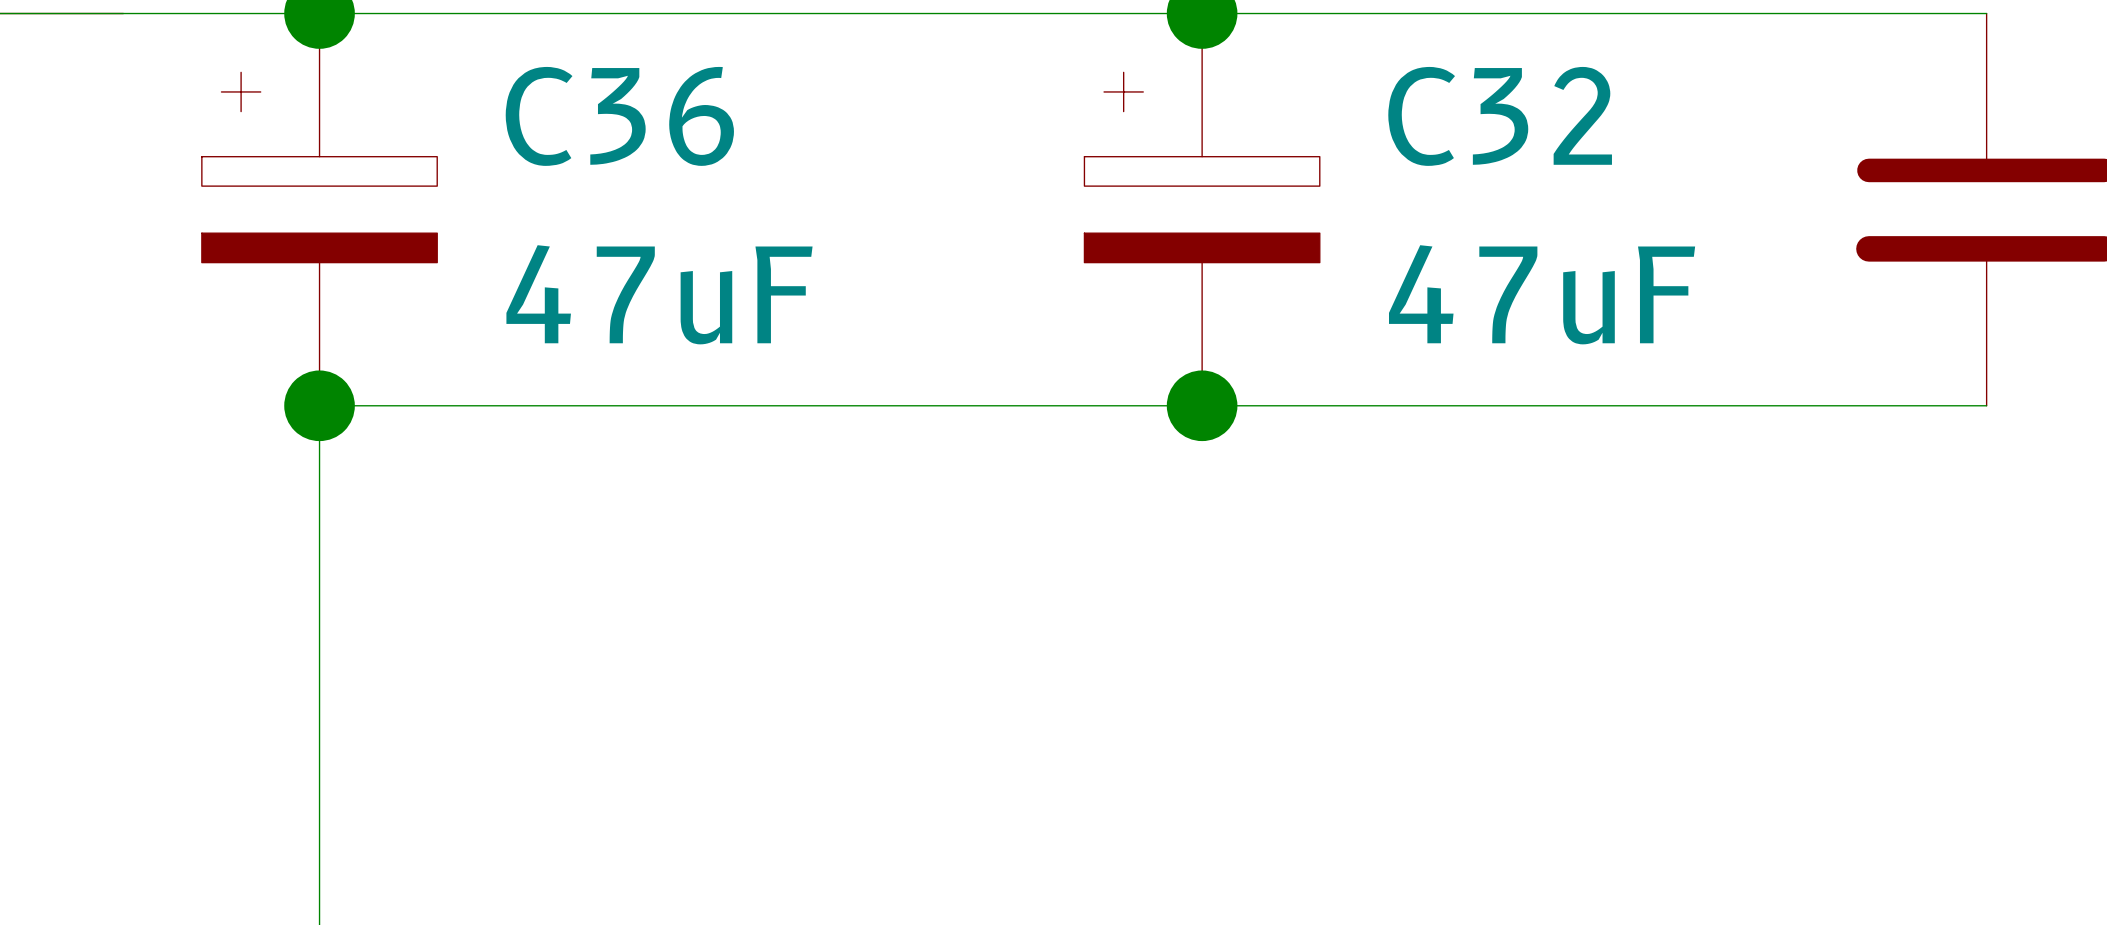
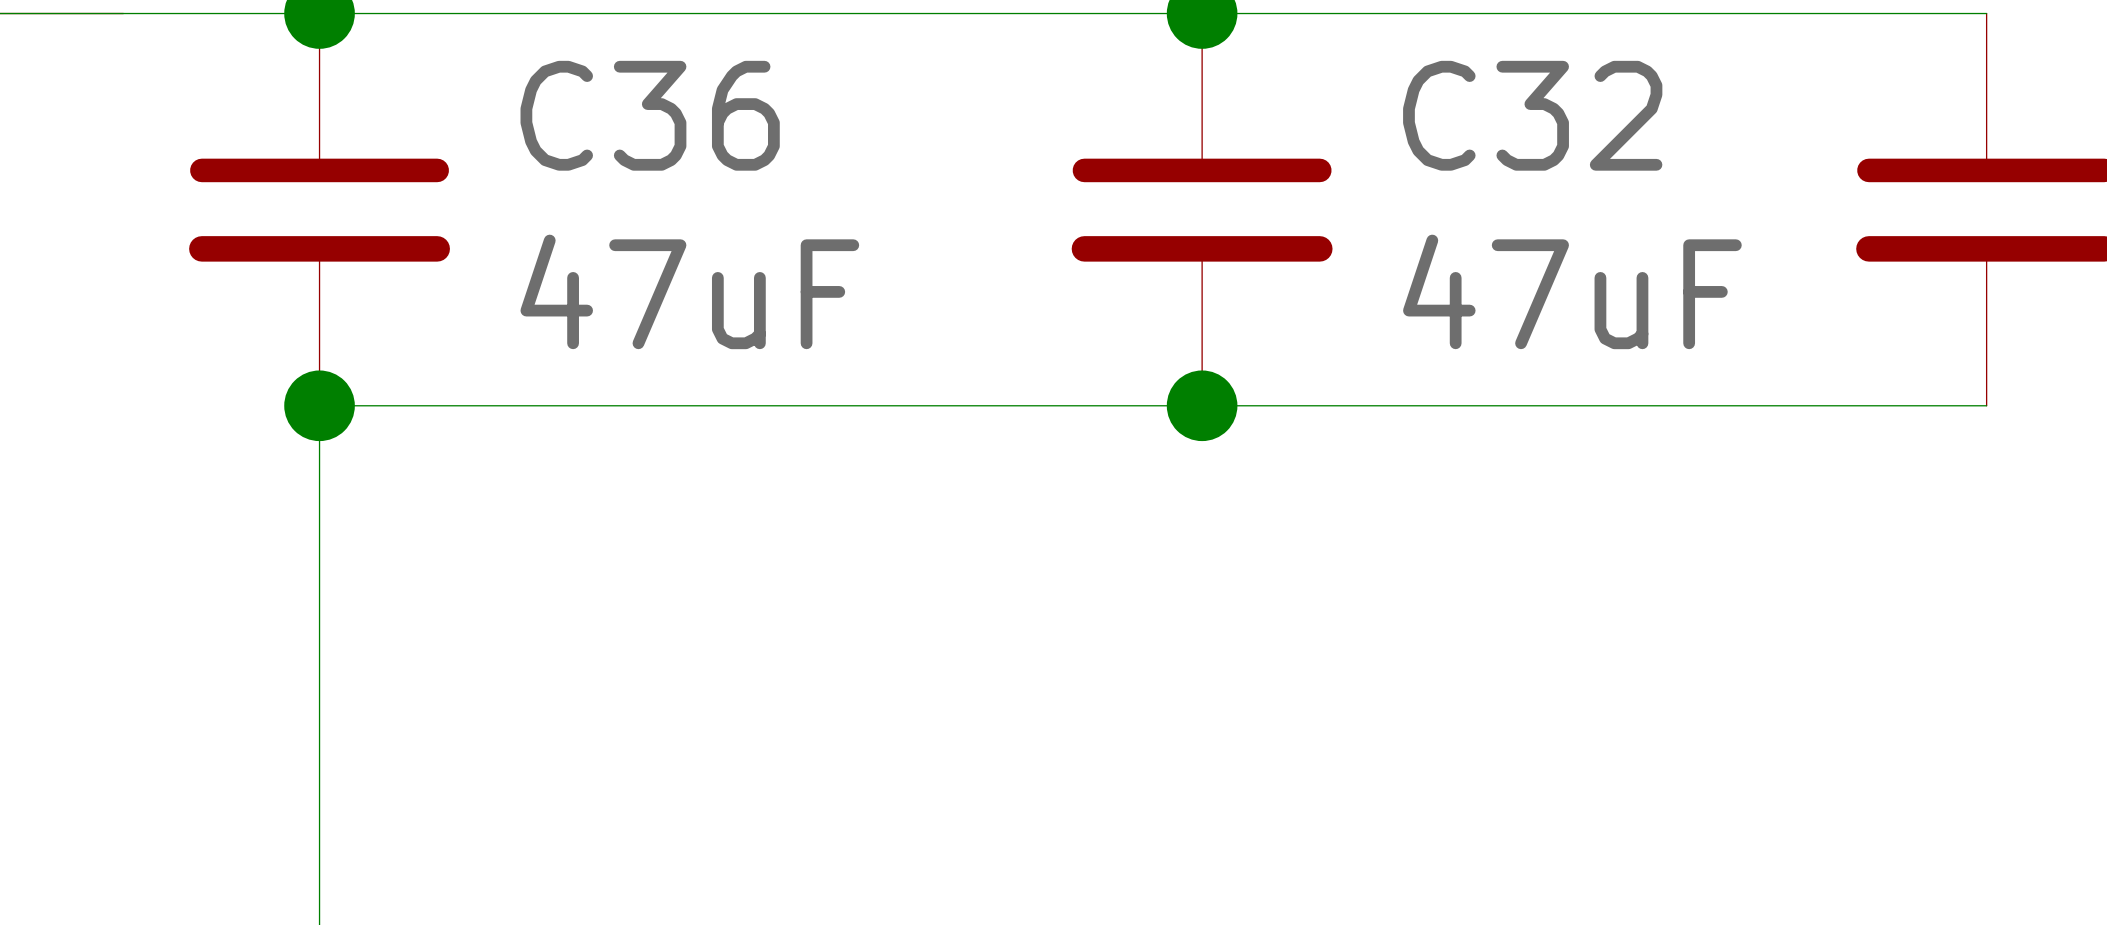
C36 symbol: [201, 13, 438, 406] -> [189, 13, 450, 406]
C32 symbol: [1084, 13, 1320, 406] -> [1071, 13, 1333, 406]

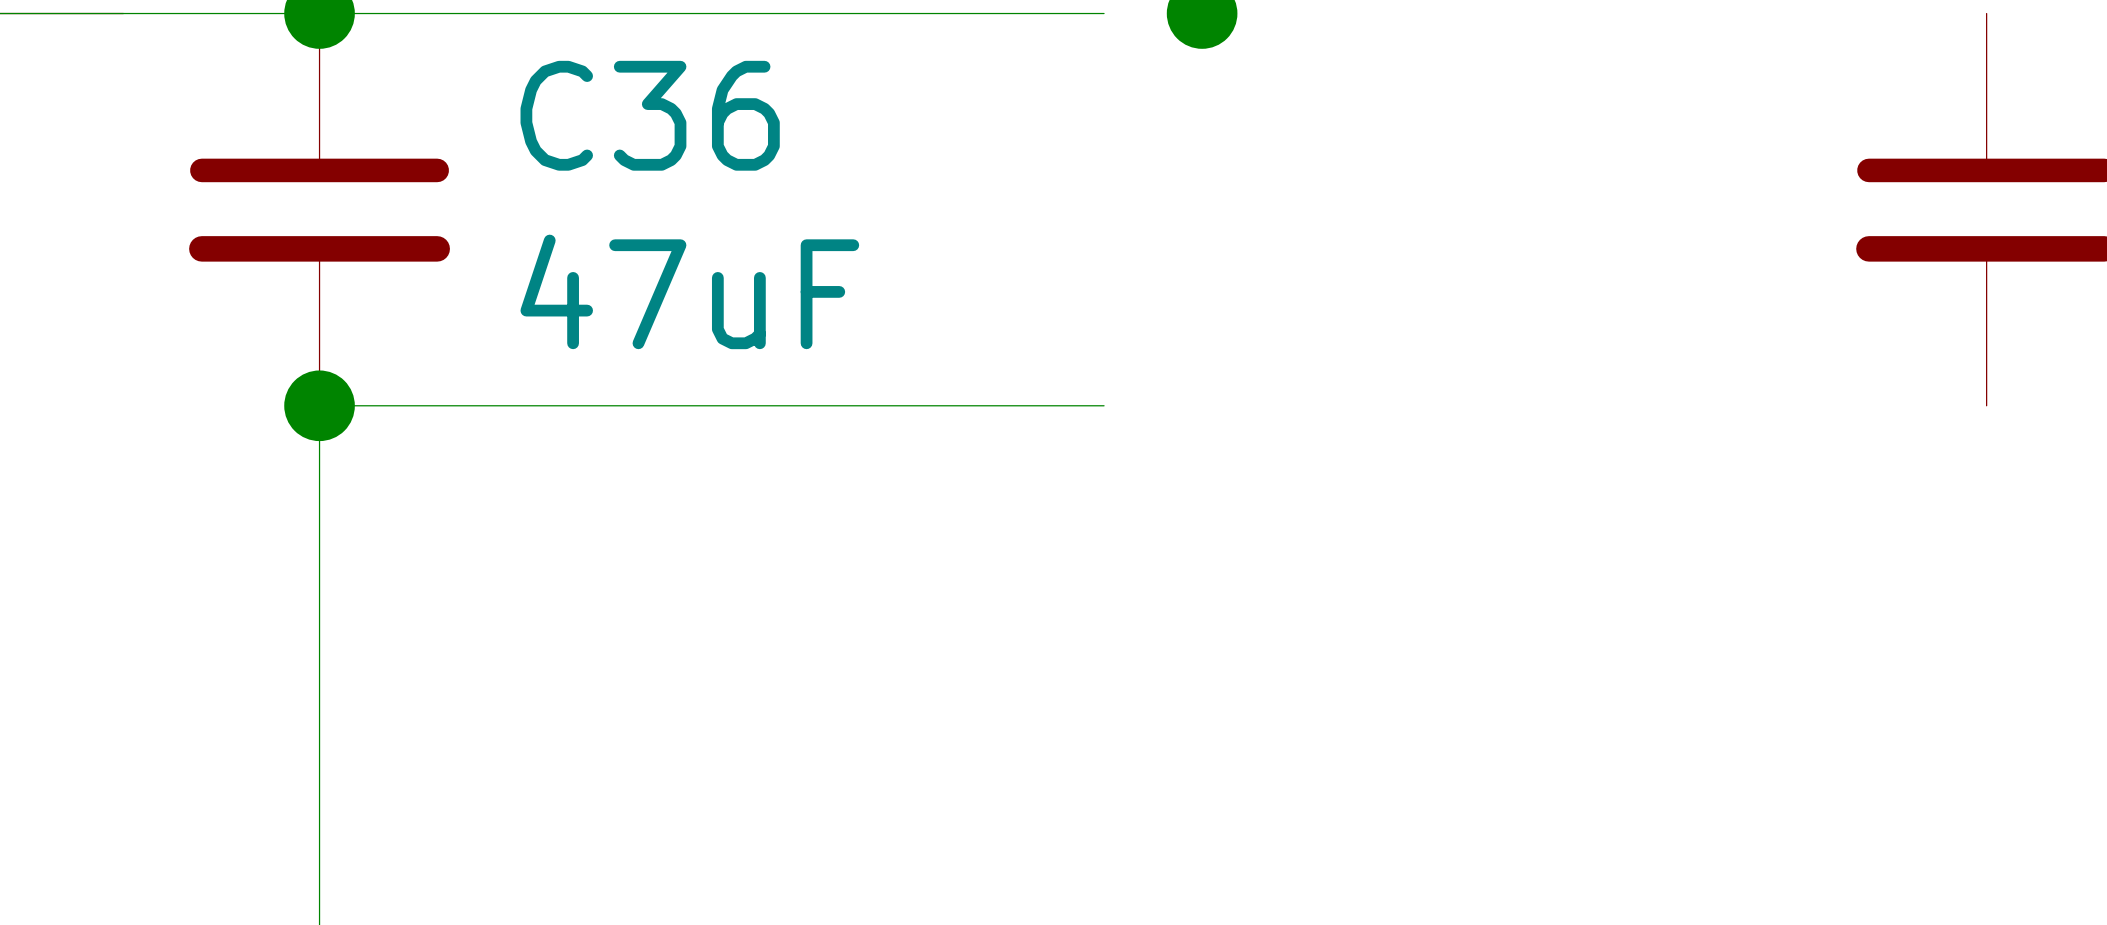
wire: (1104, 13) (1986, 13) -> none
C32: 47uF (1202, 209) -> none
wire: (1104, 405) (1986, 405) -> none
junction: (1202, 405) -> none

